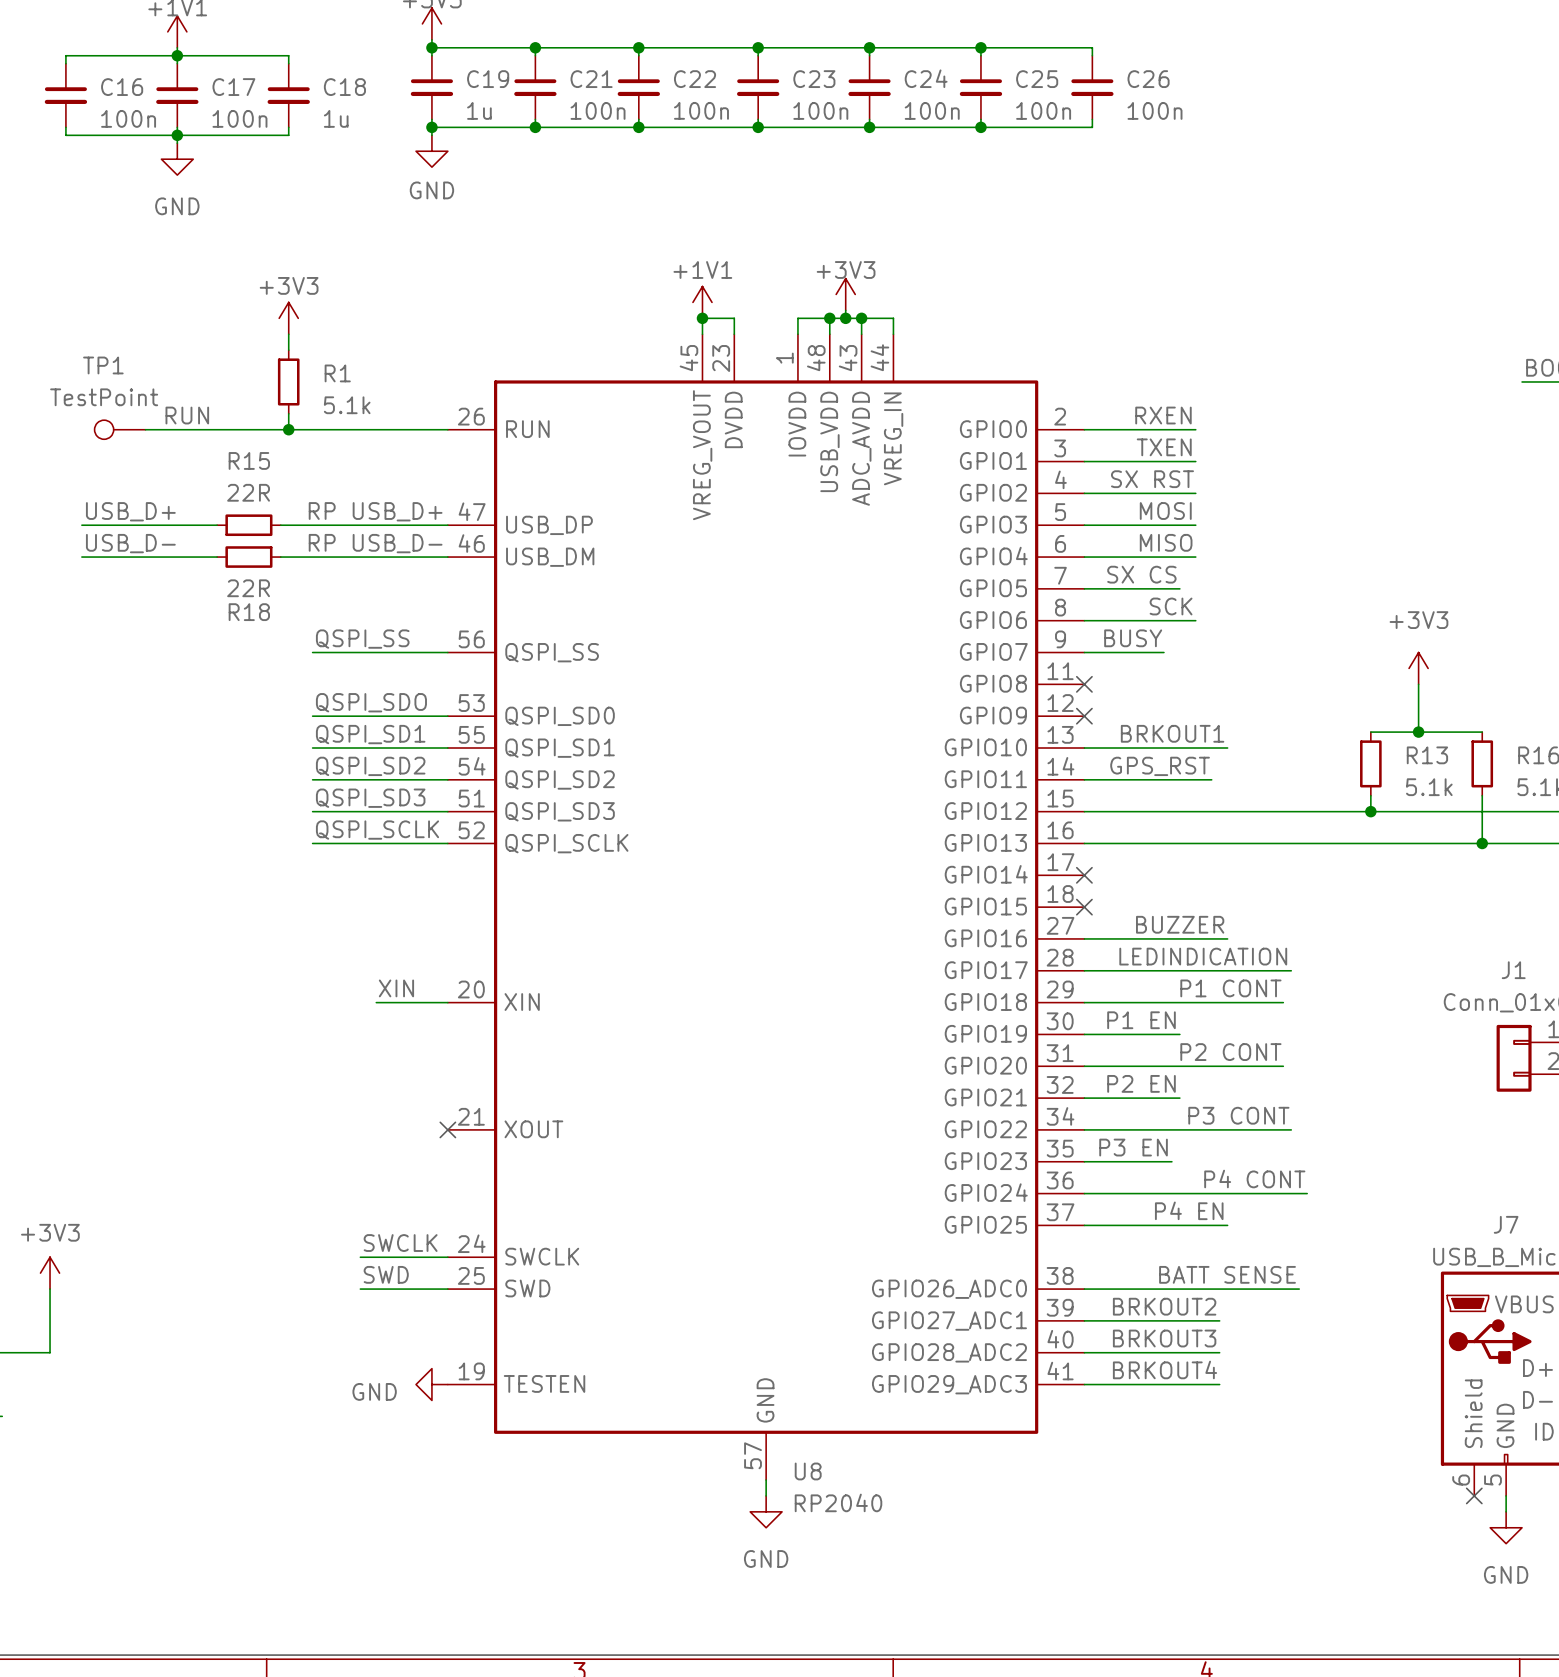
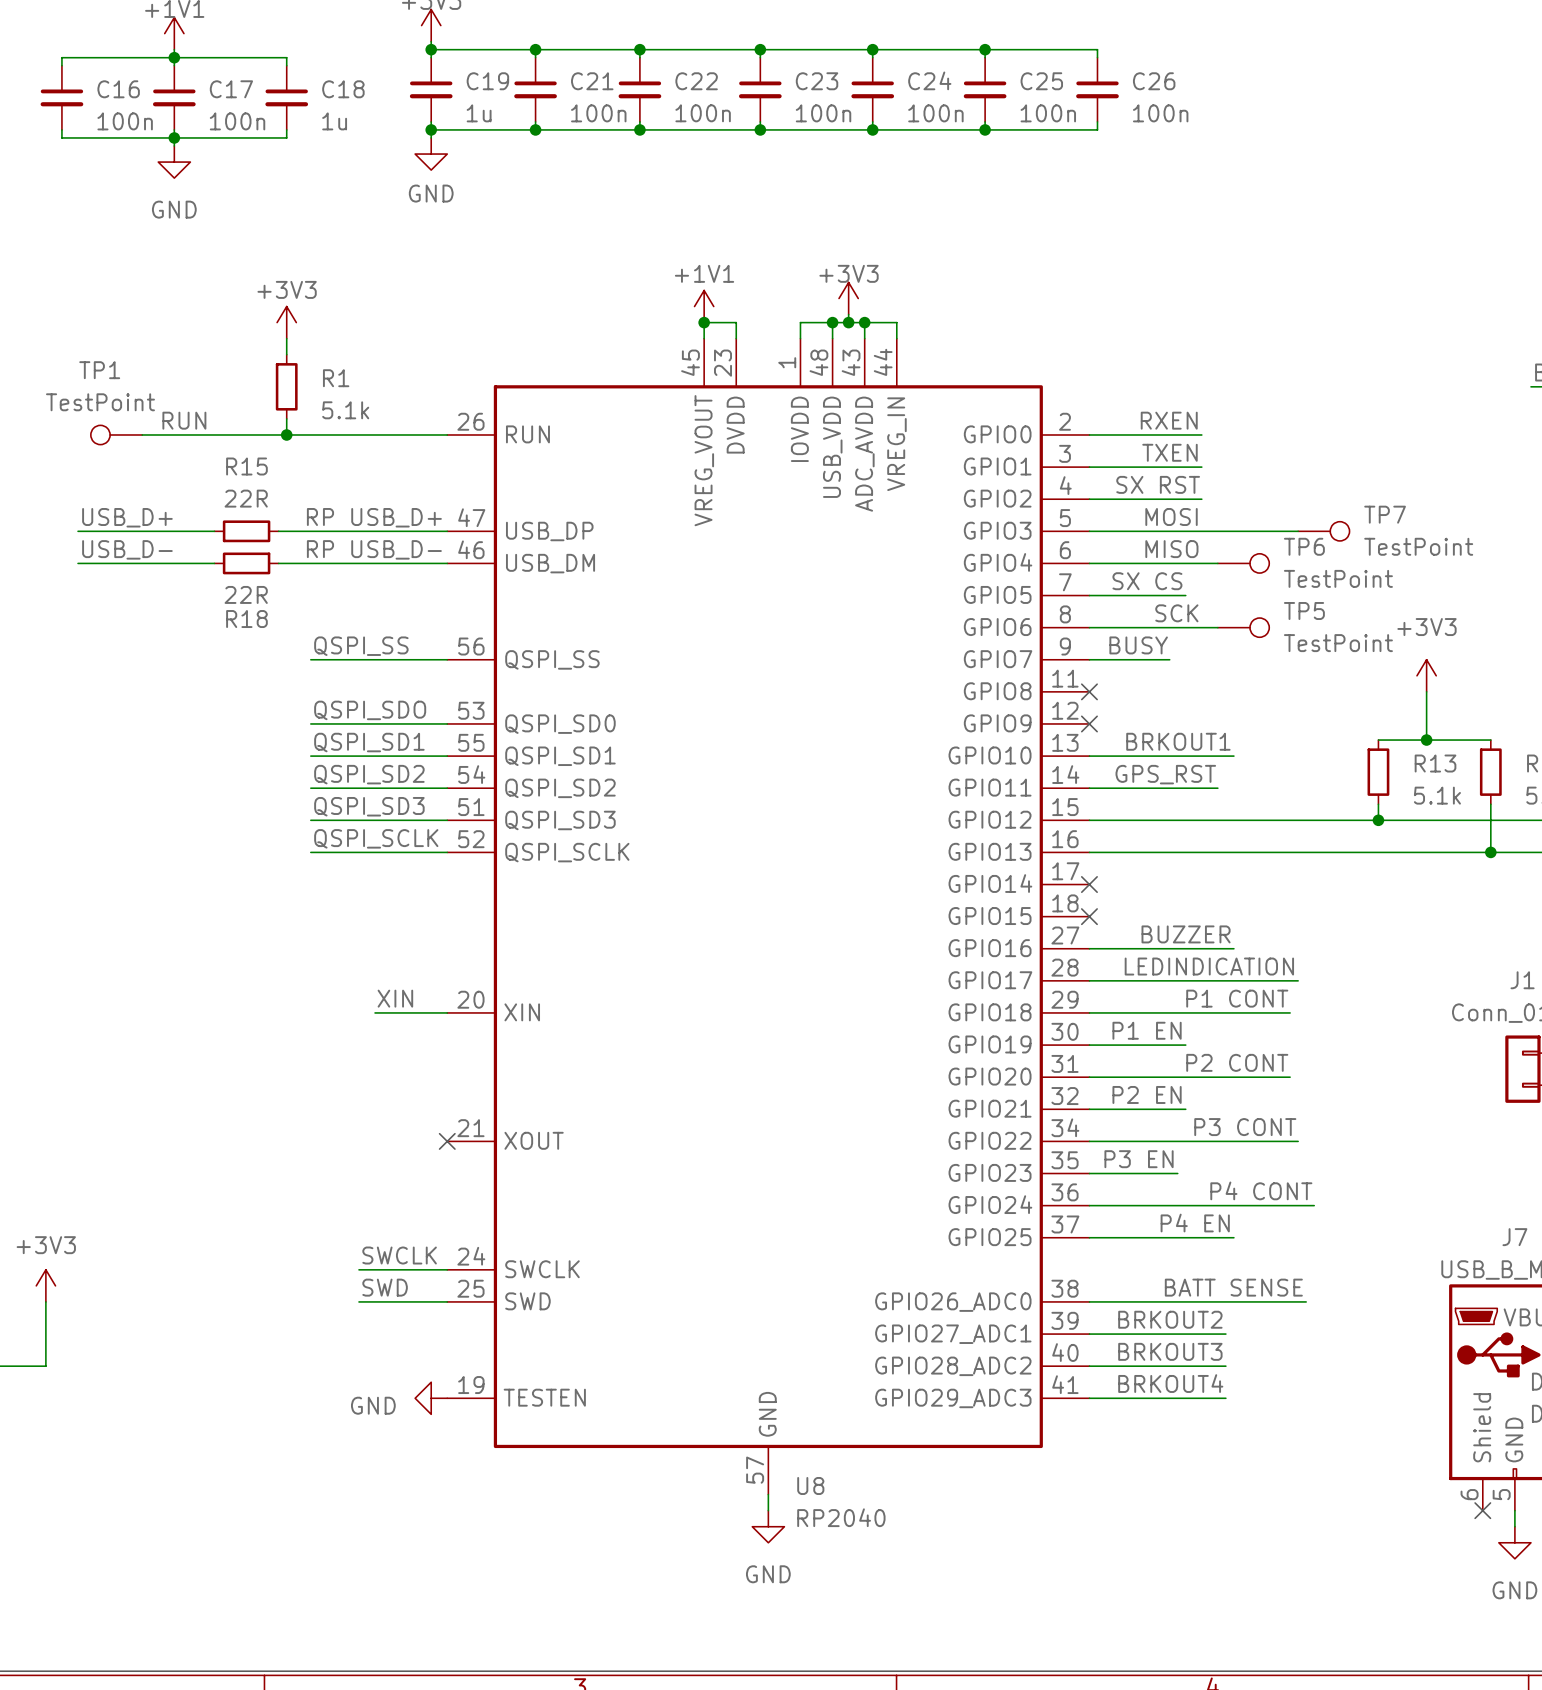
wire: none -> (1201, 531) (1298, 531)
TP7: none -> TestPoint (1323, 531)
wire: none -> (1201, 563) (1217, 563)
TP6: none -> TestPoint (1243, 563)
wire: none -> (1201, 627) (1217, 627)
TP5: none -> TestPoint (1243, 627)

